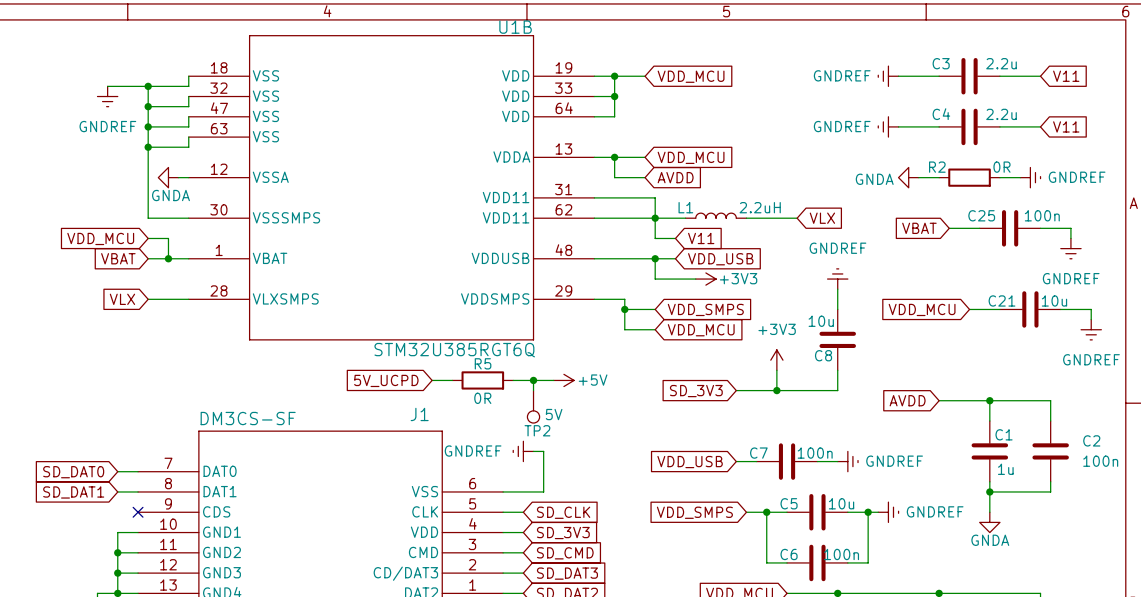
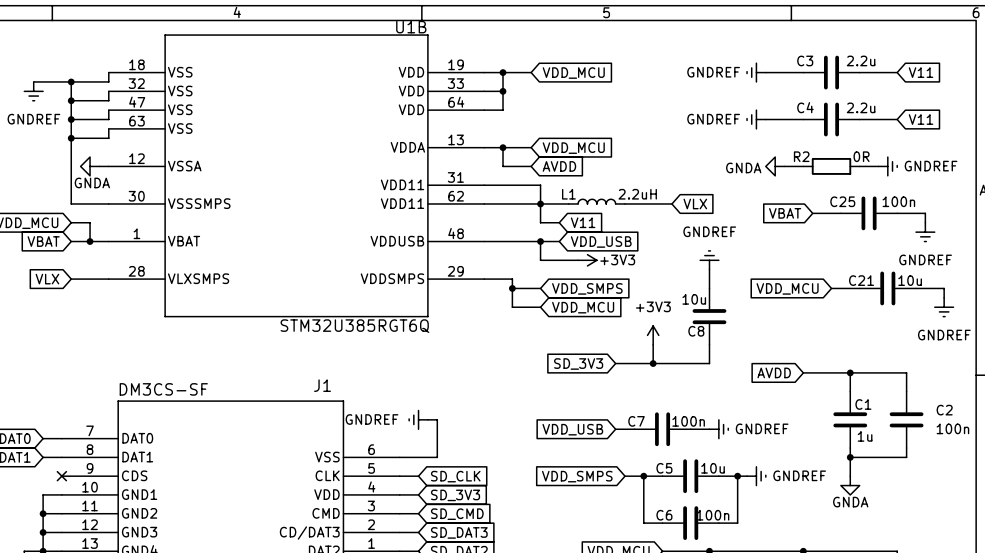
global label: 5V_UCPD (386, 380) -> none
wire: (432, 380) (452, 380) -> none
R5: 0R (482, 380) -> none
wire: (513, 380) (553, 380) -> none
wire: (533, 380) (533, 390) -> none
junction: (533, 380) -> none
power symbol: +5V (563, 380) -> none
TP2: 5V (533, 406) -> none

